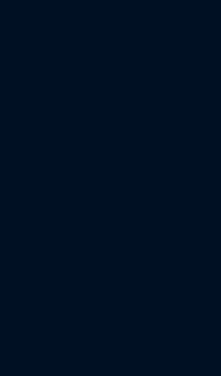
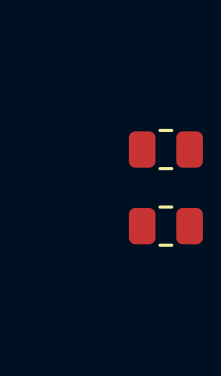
part: none -> (165, 149)
part: none -> (165, 226)

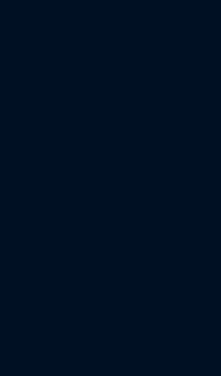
part: (165, 149) -> none
part: (165, 226) -> none

